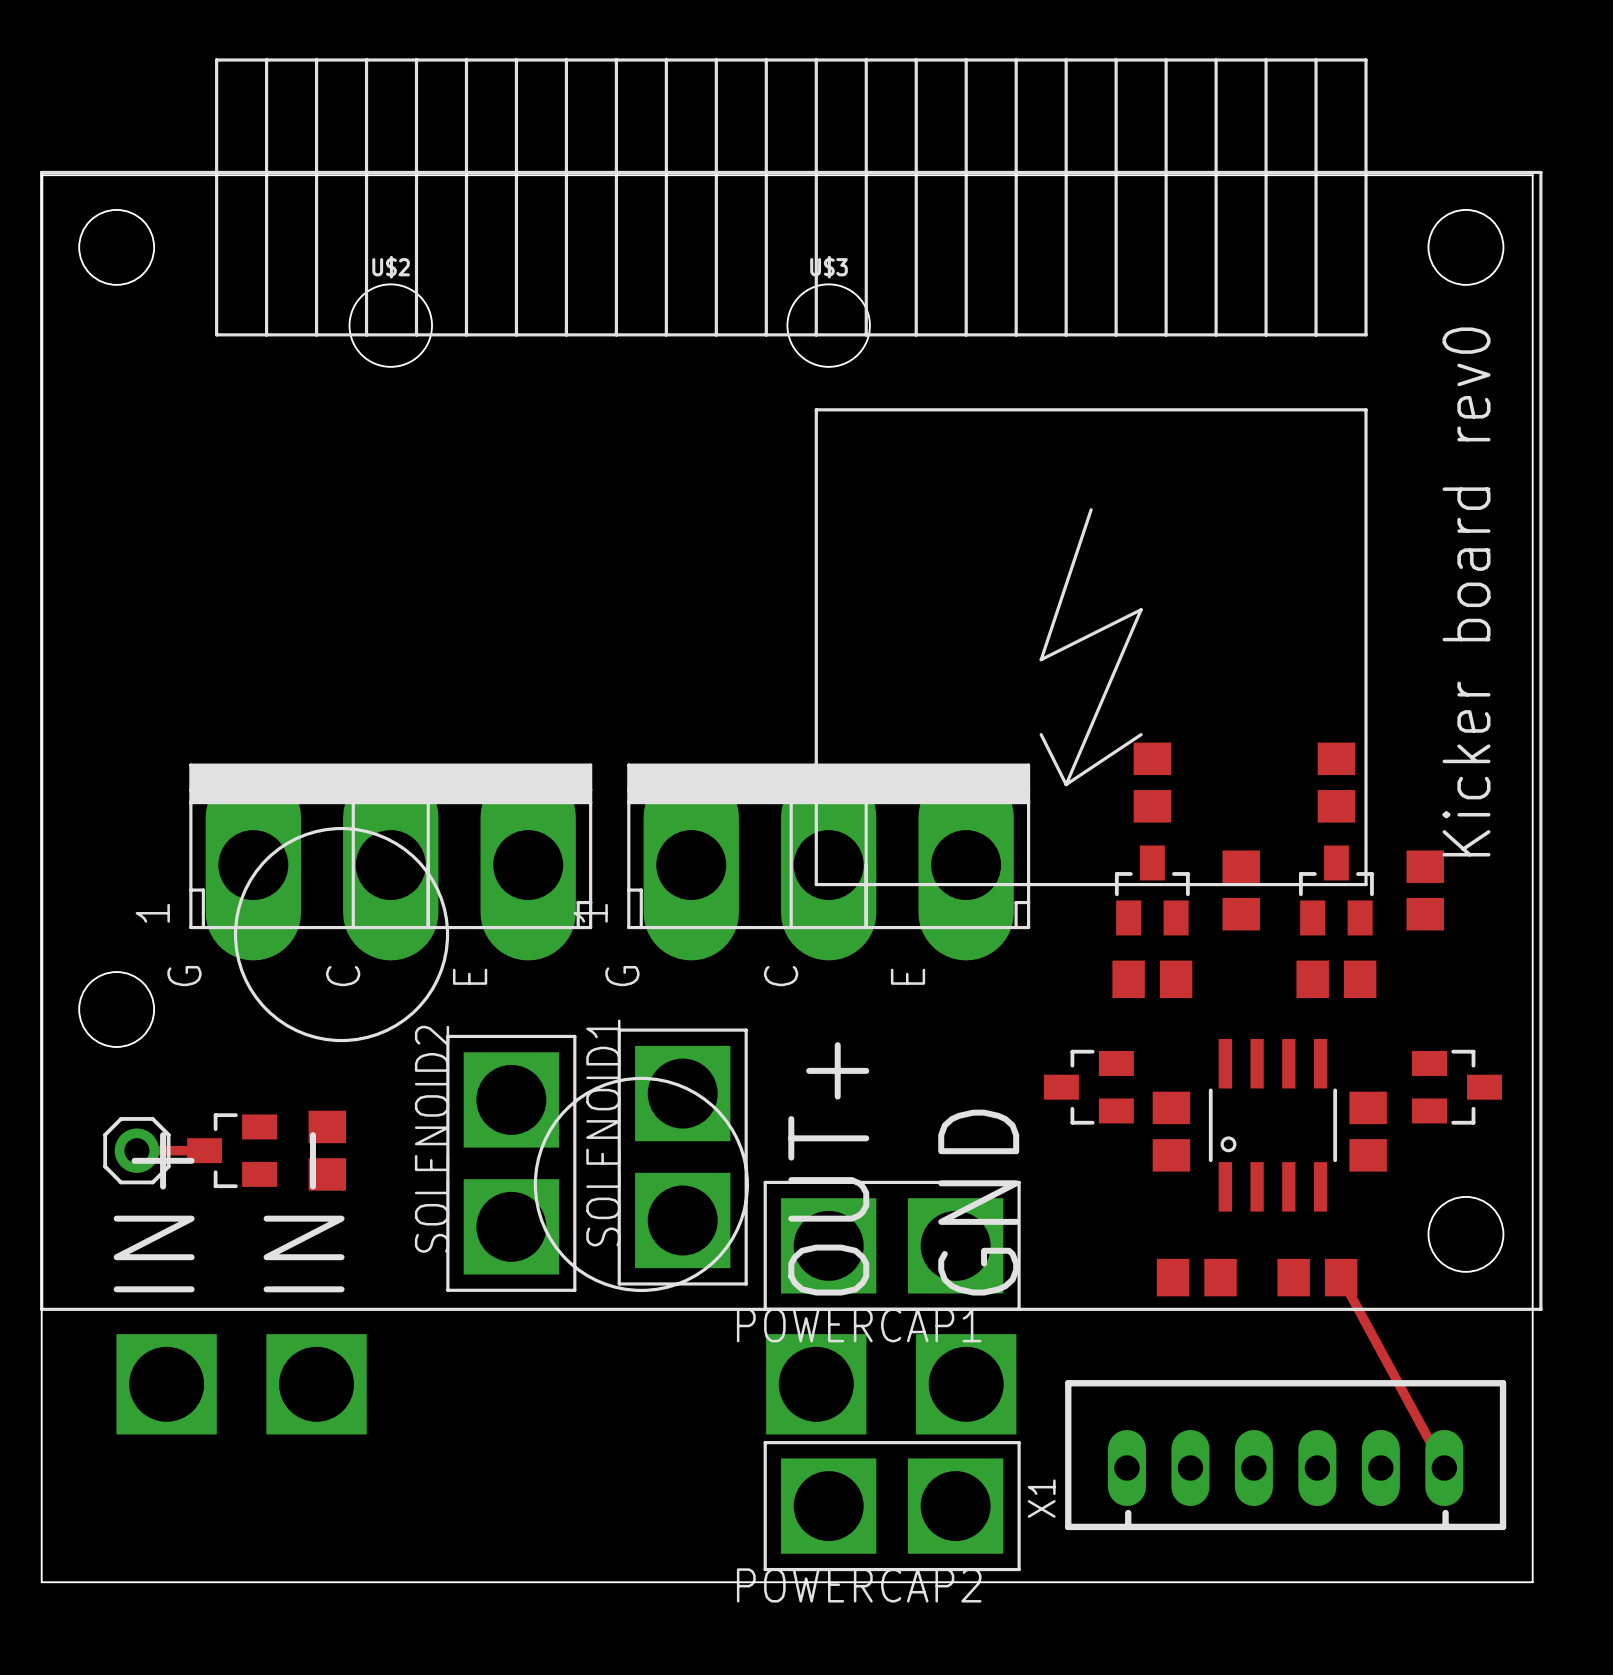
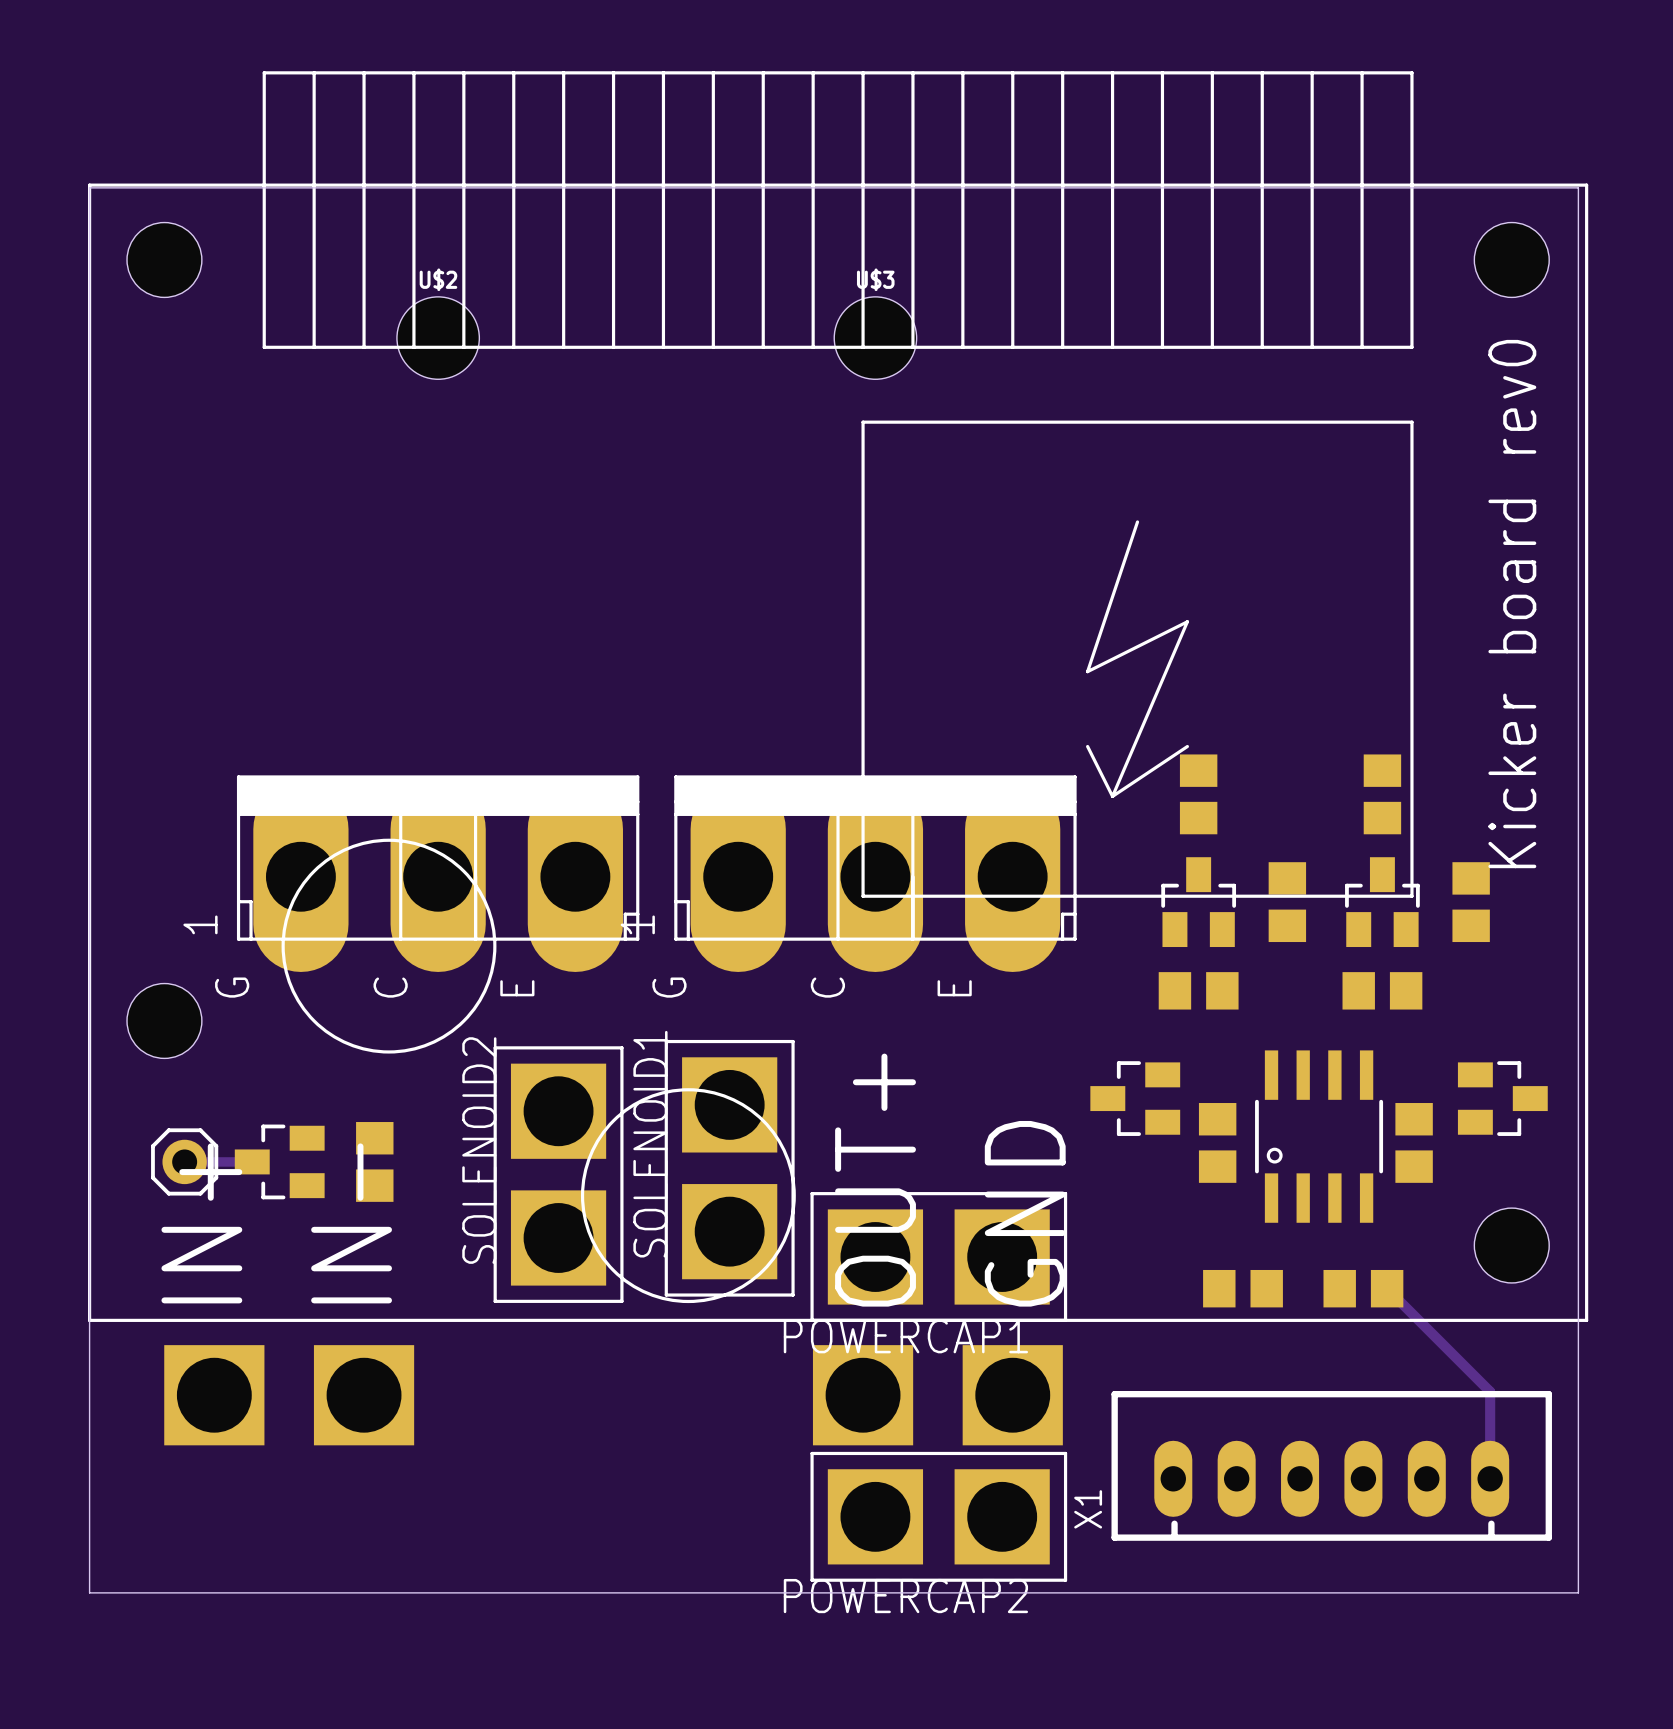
track: (1341, 1277) (1444, 1468) -> (1387, 1288) (1490, 1391) (1490, 1478)

